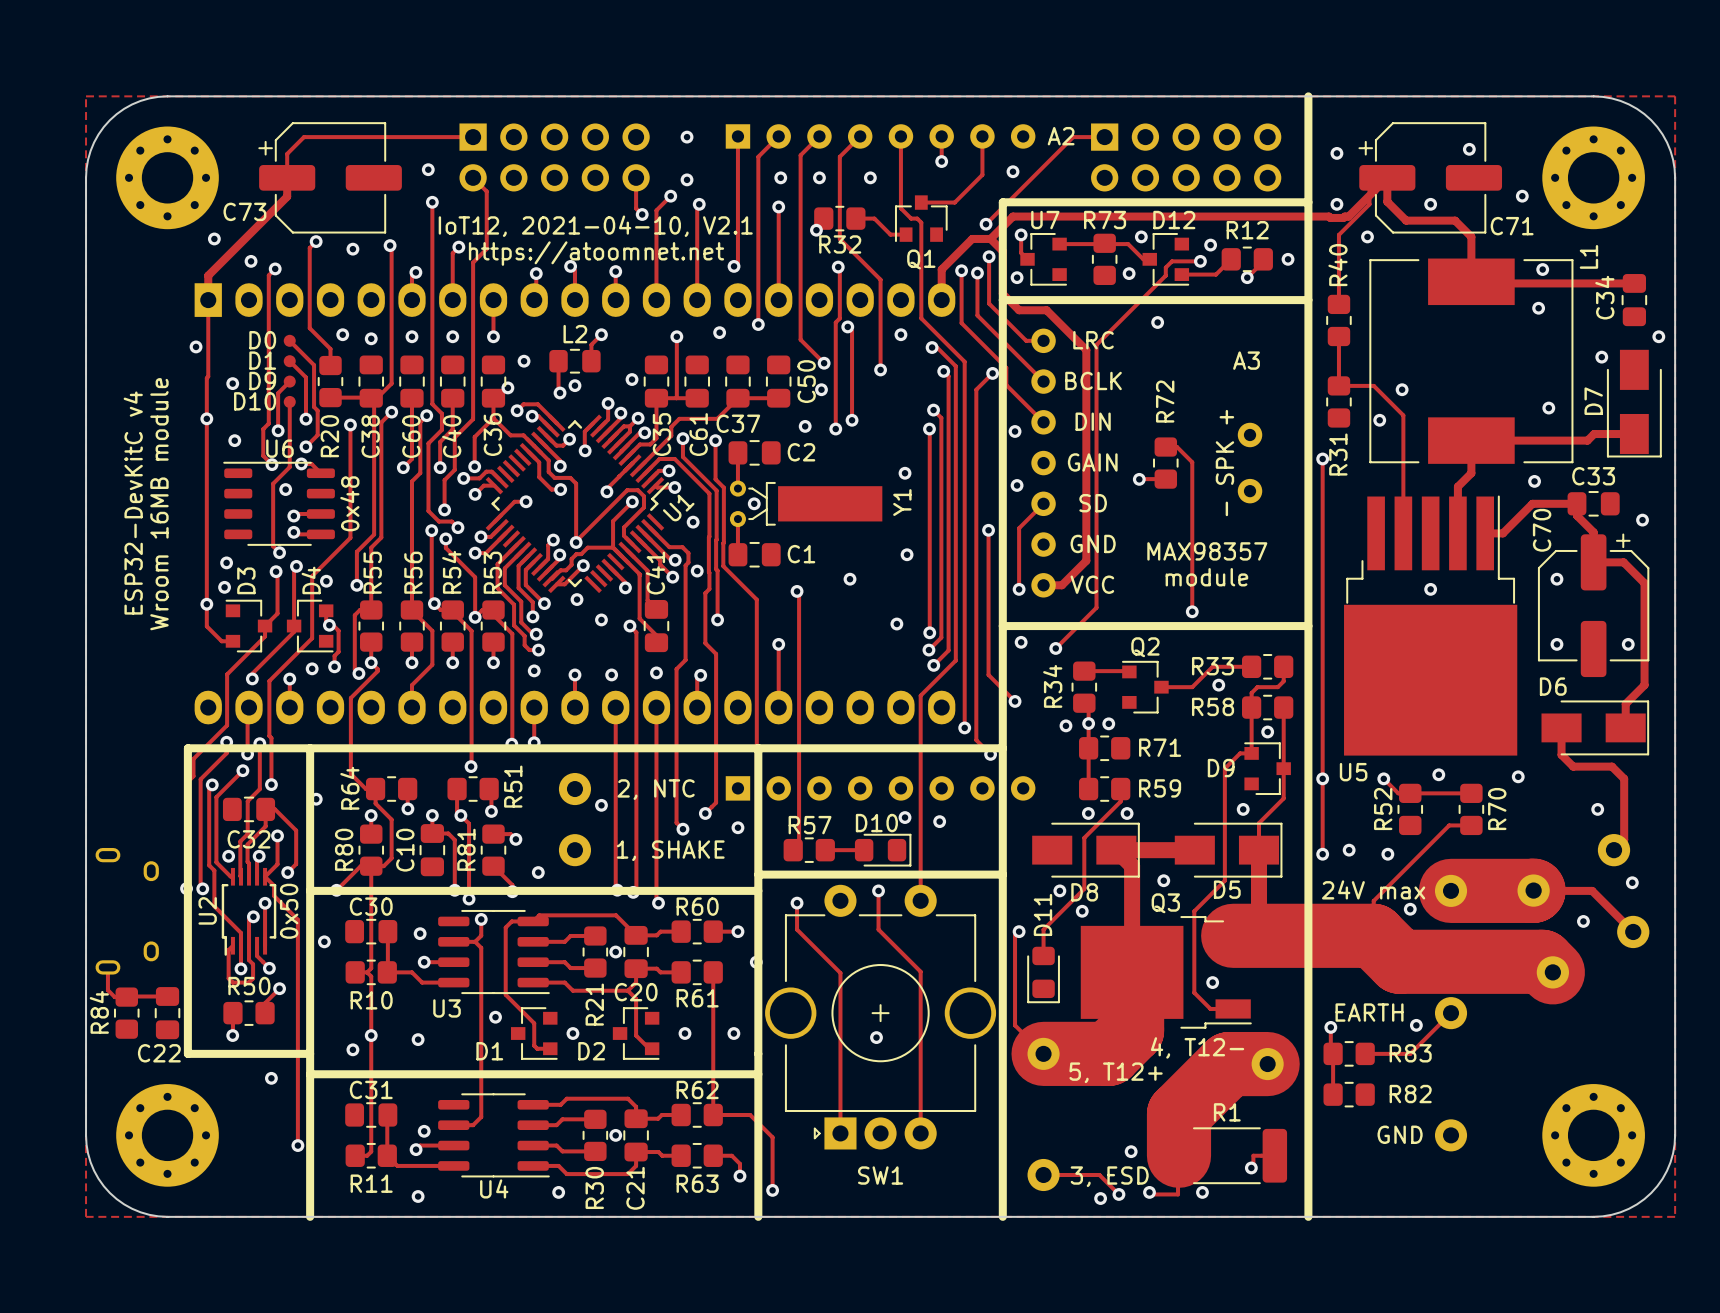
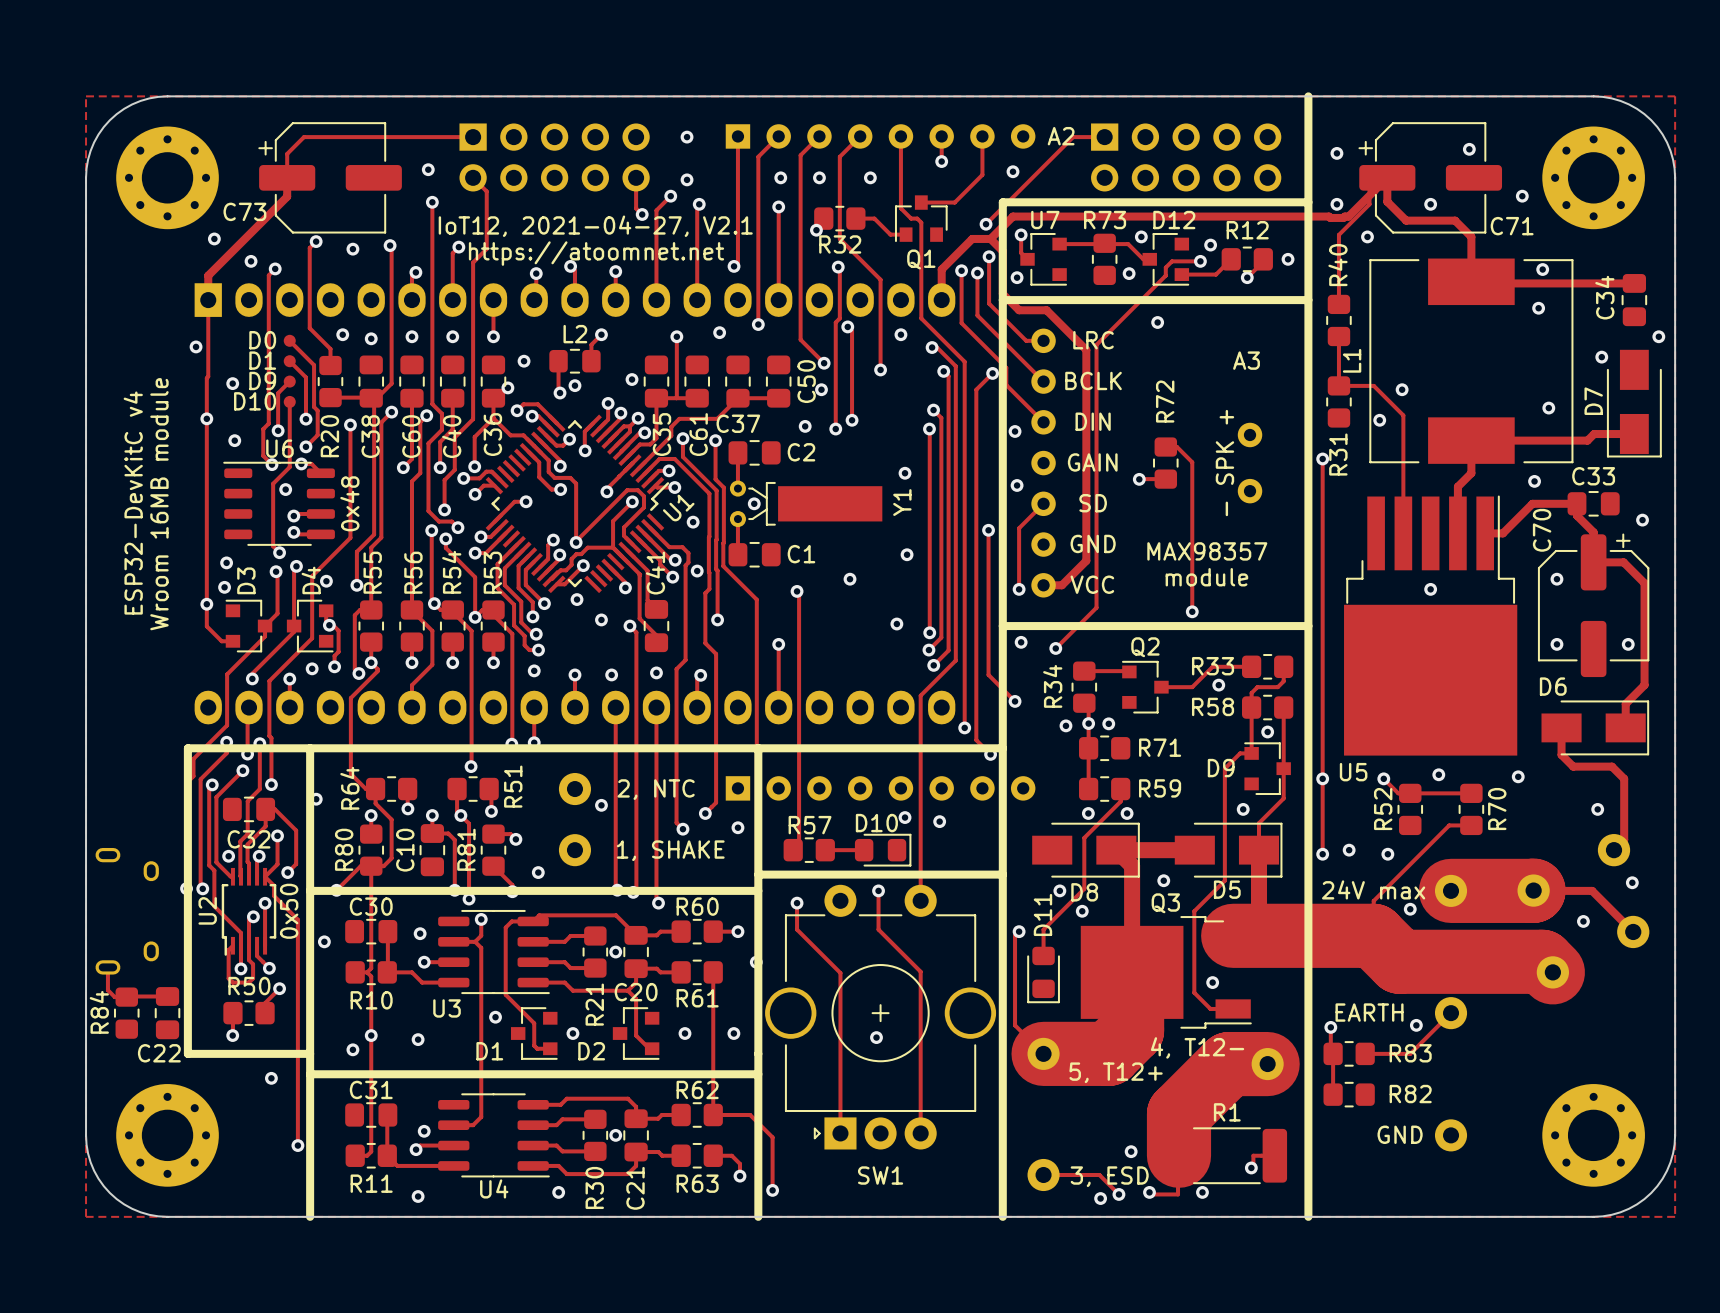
text: IoT12, 2021-04-10, V2.1 (595, 226) -> IoT12, 2021-04-27, V2.1 (595, 226)
L1 name position: L1 (1588, 256) -> L1 (1352, 360)

